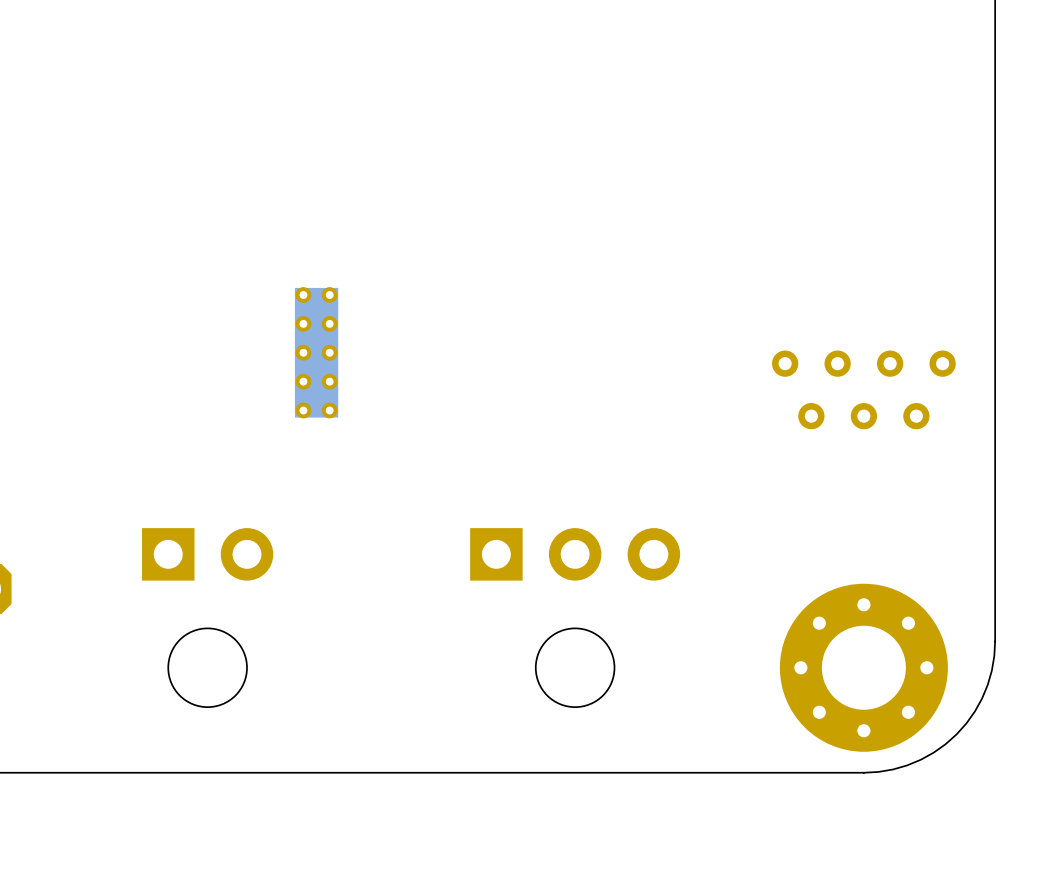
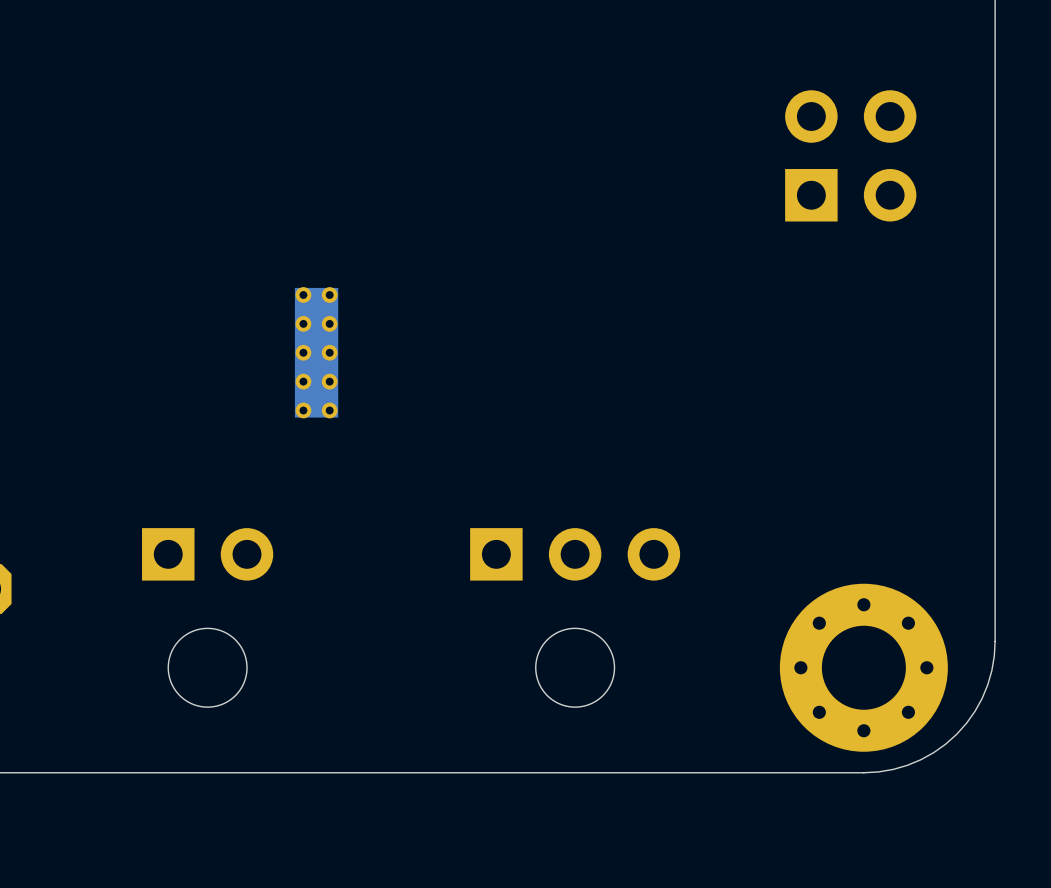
part: none -> (850, 155)
part: (785, 363) -> none
part: (837, 363) -> none
part: (890, 363) -> none
part: (942, 363) -> none
part: (811, 416) -> none
part: (863, 416) -> none
part: (916, 416) -> none

